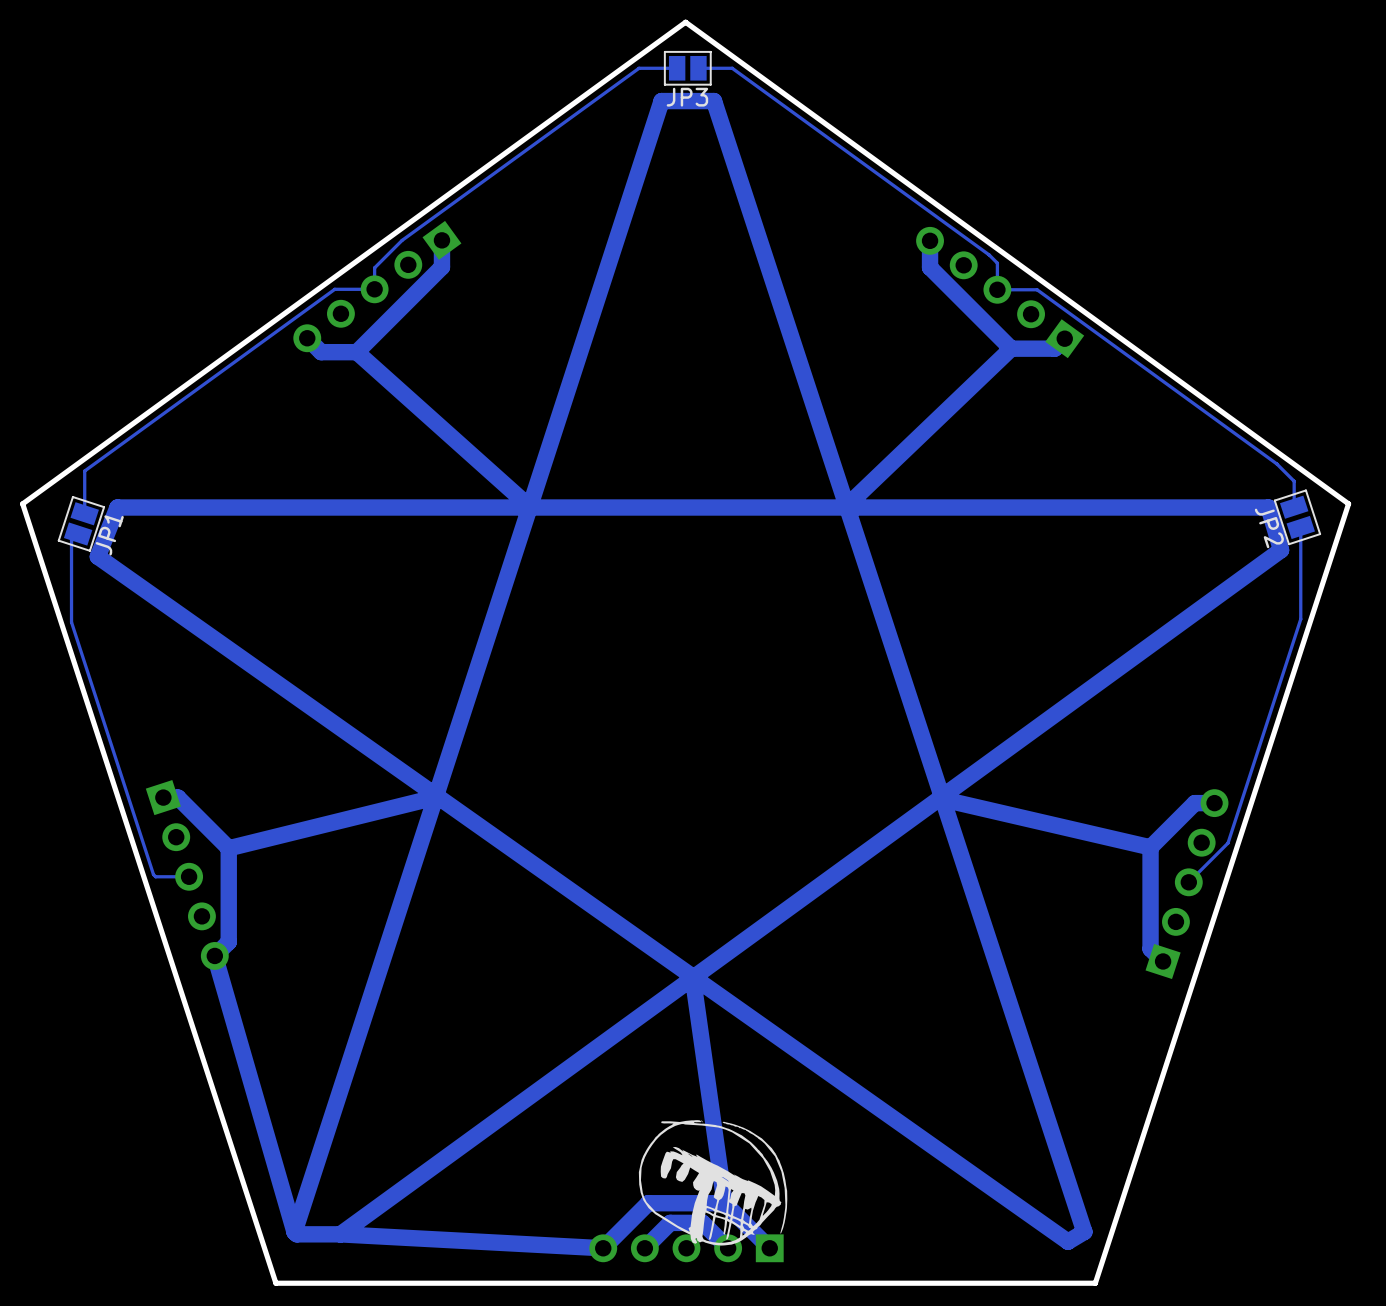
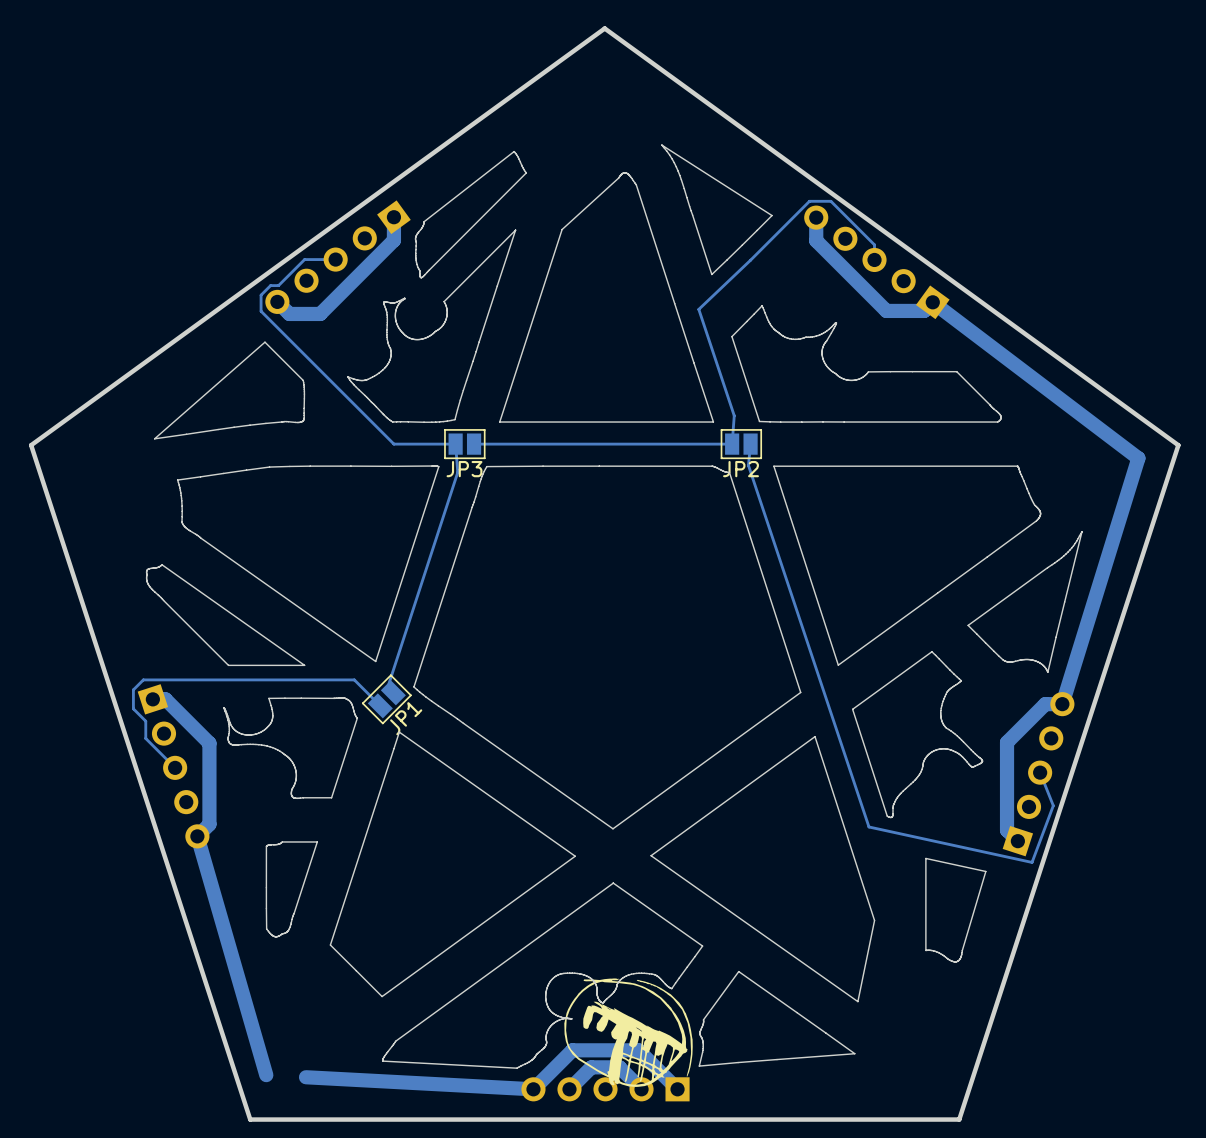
track: (677, 68) (639, 68) (402, 240) (374, 267) (374, 289) -> none
JP3 position: (687, 68) -> (464, 444)
track: (698, 68) (732, 68) (989, 254) (997, 263) (997, 272) -> (474, 444) (732, 444) (734, 415) (698, 309) (809, 201) (830, 201) (874, 244)
track: (714, 101) (1084, 1231) (1068, 1241) (97, 556) (117, 507) (1268, 507) (1281, 550) (340, 1234) (296, 1234) (294, 1231) (661, 101) (714, 101) -> none
board edge: none -> (661, 145) (672, 158) (679, 175) (711, 274) (772, 215) (661, 145)
board edge: none -> (625, 172) (636, 184) (713, 422) (499, 422) (562, 229) (621, 174) (625, 172)
track: (338, 289) (334, 289) (84, 471) (84, 513) -> (304, 259) (278, 285) (270, 285) (261, 295) (261, 311) (393, 444) (455, 444) (457, 472) (386, 690)
track: (997, 289) (1037, 289) (1276, 463) (1294, 481) (1294, 507) -> none
board edge: none -> (420, 277) (416, 260) (415, 238) (424, 221) (514, 151) (526, 172) (421, 277)
board edge: none -> (404, 298) (393, 303) (384, 301)
board edge: none -> (404, 298) (399, 303) (395, 311) (395, 320) (399, 329) (406, 336) (412, 339) (421, 339) (430, 335) (440, 327) (445, 320) (447, 310) (444, 301) (515, 230) (454, 419) (435, 422) (392, 422) (347, 376) (358, 380) (367, 379) (381, 371) (389, 361) (391, 351) (387, 339) (387, 315) (383, 303)
track: none -> (932, 302) (1138, 458) (1062, 704)
track: (1011, 348) (845, 507) -> none
track: (356, 352) (530, 507) -> none
board edge: none -> (835, 322) (818, 335) (789, 338) (772, 327) (761, 305) (731, 336) (759, 421) (997, 422) (1000, 419) (998, 413) (956, 371) (868, 371) (855, 379) (840, 377) (827, 366) (822, 354) (823, 345) (836, 323)
board edge: none -> (264, 342) (303, 380) (302, 421) (249, 425) (154, 438) (264, 342)
JP2 rotation: 0° (1297, 517) -> 72° counterclockwise (741, 444)
JP2 position: (1297, 517) -> (741, 444)
JP1 rotation: 0° (81, 523) -> 27° clockwise (386, 699)
JP1 position: (81, 523) -> (386, 699)
board edge: none -> (432, 466) (269, 467) (177, 480) (181, 498) (181, 522) (187, 529) (375, 661) (438, 466) (432, 466)
track: (1300, 527) (1300, 619) (1228, 843) (1188, 882) -> (750, 444) (748, 465) (868, 826) (1032, 862) (1053, 805) (1040, 772)
board edge: none -> (712, 466) (729, 472) (800, 692) (612, 828) (413, 686) (480, 481) (486, 466) (712, 466)
board edge: none -> (1017, 466) (773, 466) (838, 665) (1037, 519) (1040, 511) (1031, 499) (1018, 467)
track: (78, 534) (71, 540) (71, 622) (153, 874) (155, 876) (189, 876) -> (380, 705) (354, 679) (143, 679) (133, 689) (133, 708) (145, 721) (145, 738) (175, 767)
board edge: none -> (1081, 531) (1047, 672) (1042, 664) (1033, 660) (1009, 662) (1003, 660) (968, 625) (1061, 557) (1073, 545) (1081, 531)
board edge: none -> (162, 564) (304, 665) (228, 665) (148, 585) (147, 570) (162, 564)
board edge: none -> (931, 651) (961, 680) (949, 689) (944, 696) (940, 710) (942, 723) (982, 761) (972, 767) (959, 754) (950, 749) (941, 748) (931, 752) (924, 759) (918, 776) (896, 799) (893, 805) (892, 815) (890, 817) (887, 816) (852, 709) (931, 651)
track: (437, 796) (228, 848) -> none
track: (939, 798) (1150, 847) -> none
board edge: none -> (224, 708) (233, 728) (240, 733) (250, 735) (262, 731) (271, 722) (272, 713) (268, 698) (342, 697) (349, 700) (357, 718) (331, 797) (292, 797) (291, 791) (296, 774) (291, 760) (280, 751) (269, 746) (230, 743) (228, 739) (228, 724) (223, 708)
board edge: none -> (399, 732) (330, 945) (382, 996) (575, 856) (399, 732)
board edge: none -> (815, 736) (874, 920) (857, 1001) (651, 855) (815, 736)
board edge: none -> (317, 841) (289, 928) (279, 935) (273, 936) (266, 928) (266, 846) (282, 841) (317, 841)
track: (692, 977) (724, 1203) -> none
board edge: none -> (925, 858) (985, 871) (961, 956) (956, 961) (950, 960) (936, 951) (925, 950) (925, 858)
board edge: none -> (613, 883) (702, 946) (671, 988) (654, 974) (631, 974) (620, 980) (614, 991) (602, 1002) (597, 997) (595, 983) (590, 977) (577, 973) (560, 973) (553, 977) (548, 983) (545, 992) (546, 1002) (554, 1013) (571, 1018) (561, 1019) (552, 1024) (547, 1032) (544, 1047) (531, 1060) (517, 1068) (382, 1061) (395, 1041) (613, 883)
board edge: none -> (738, 971) (825, 1033) (854, 1053) (699, 1066) (703, 1046) (700, 1032) (703, 1019) (738, 971)

